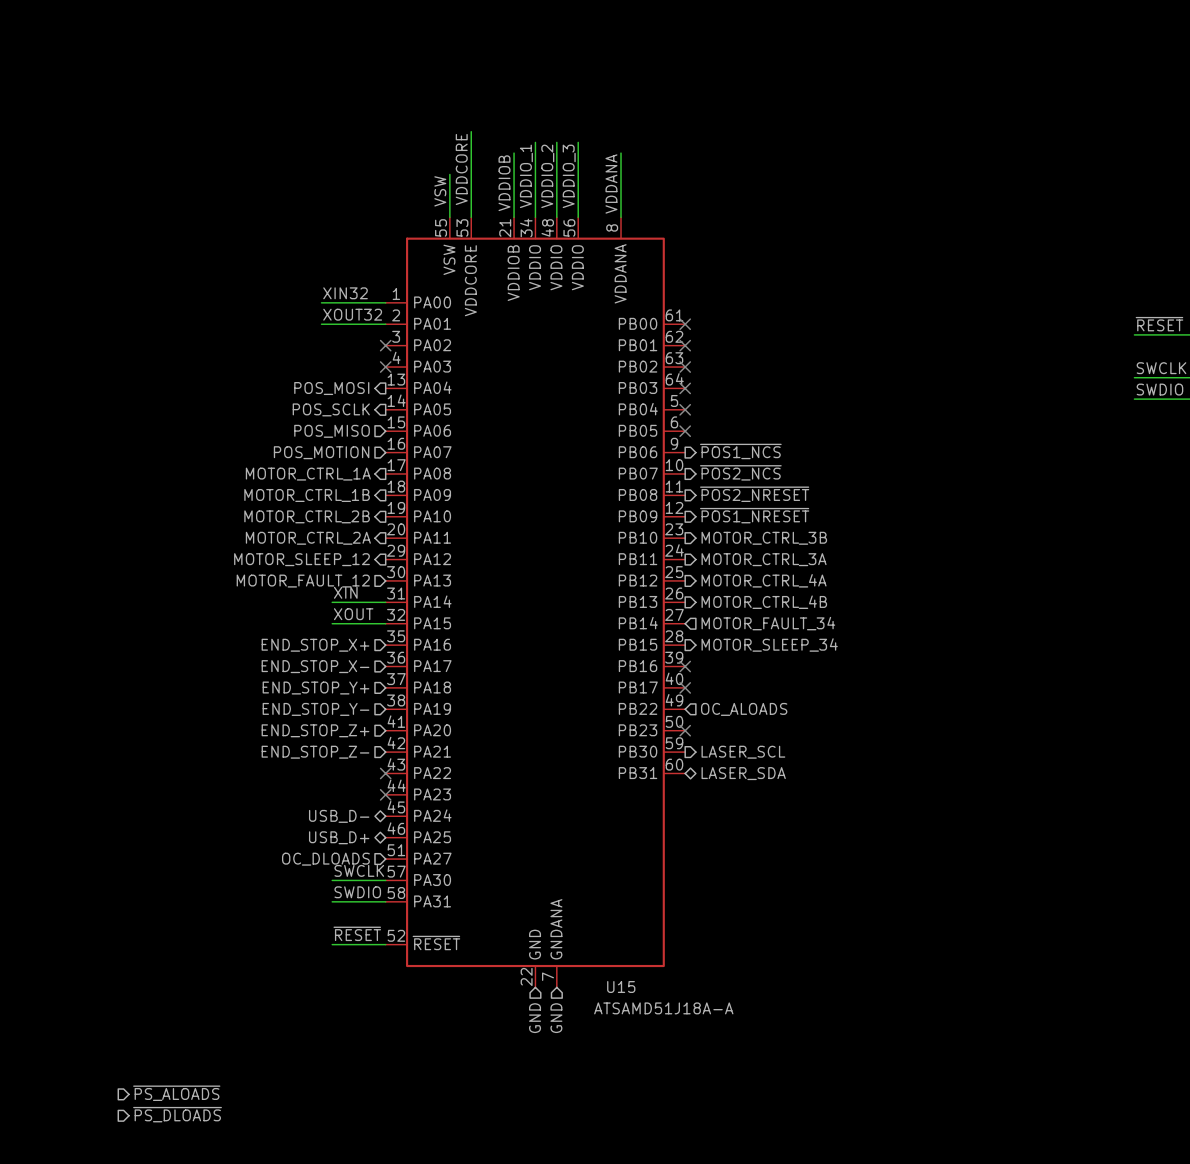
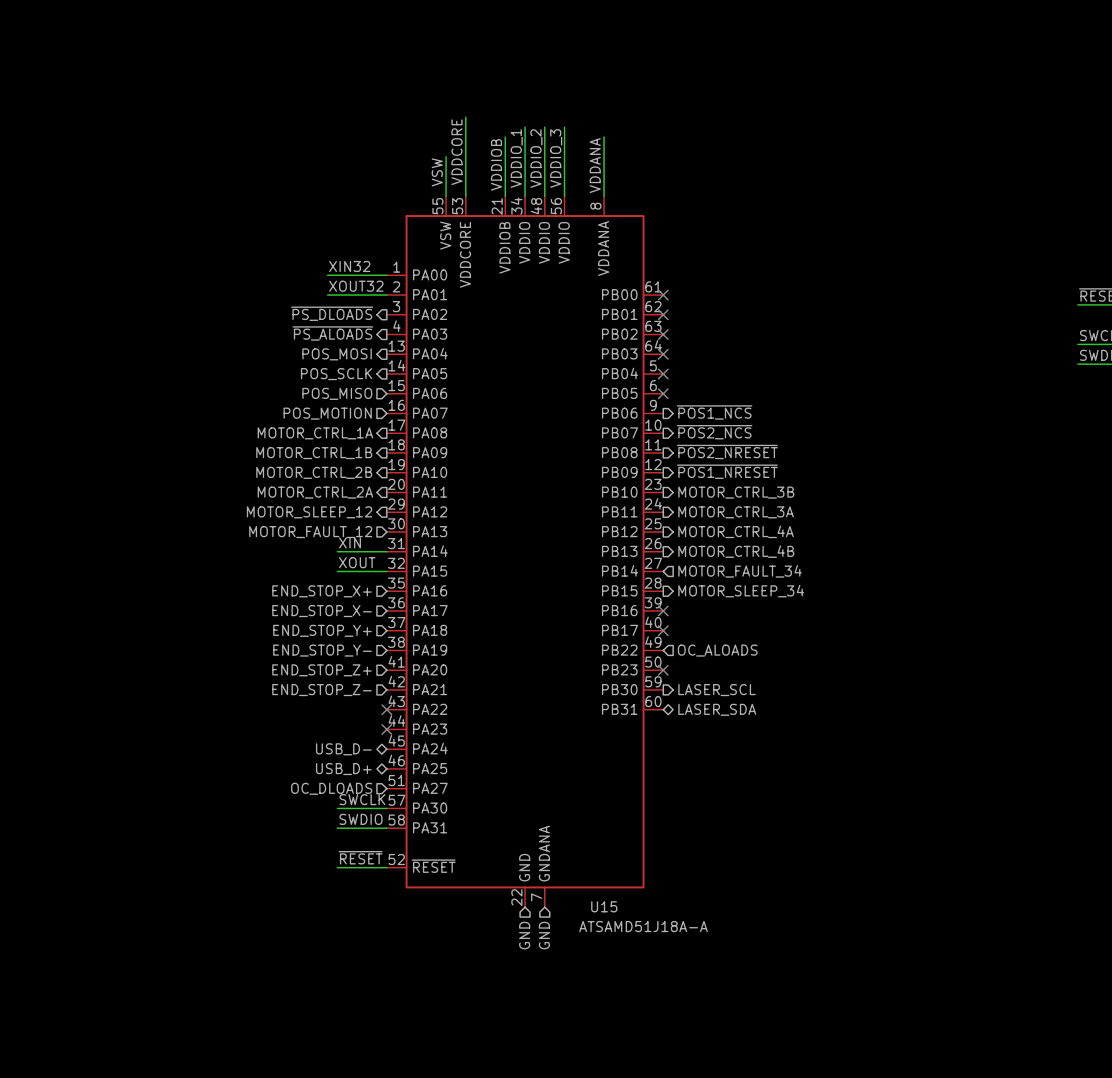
hierarchical label: none -> ~{PS_DLOADS} (332, 313)
no-connect mark: (385, 345) -> none
hierarchical label: none -> ~{PS_ALOADS} (332, 333)
no-connect mark: (385, 367) -> none
hierarchical label: ~{PS_ALOADS} (176, 1093) -> none
hierarchical label: ~{PS_DLOADS} (177, 1114) -> none

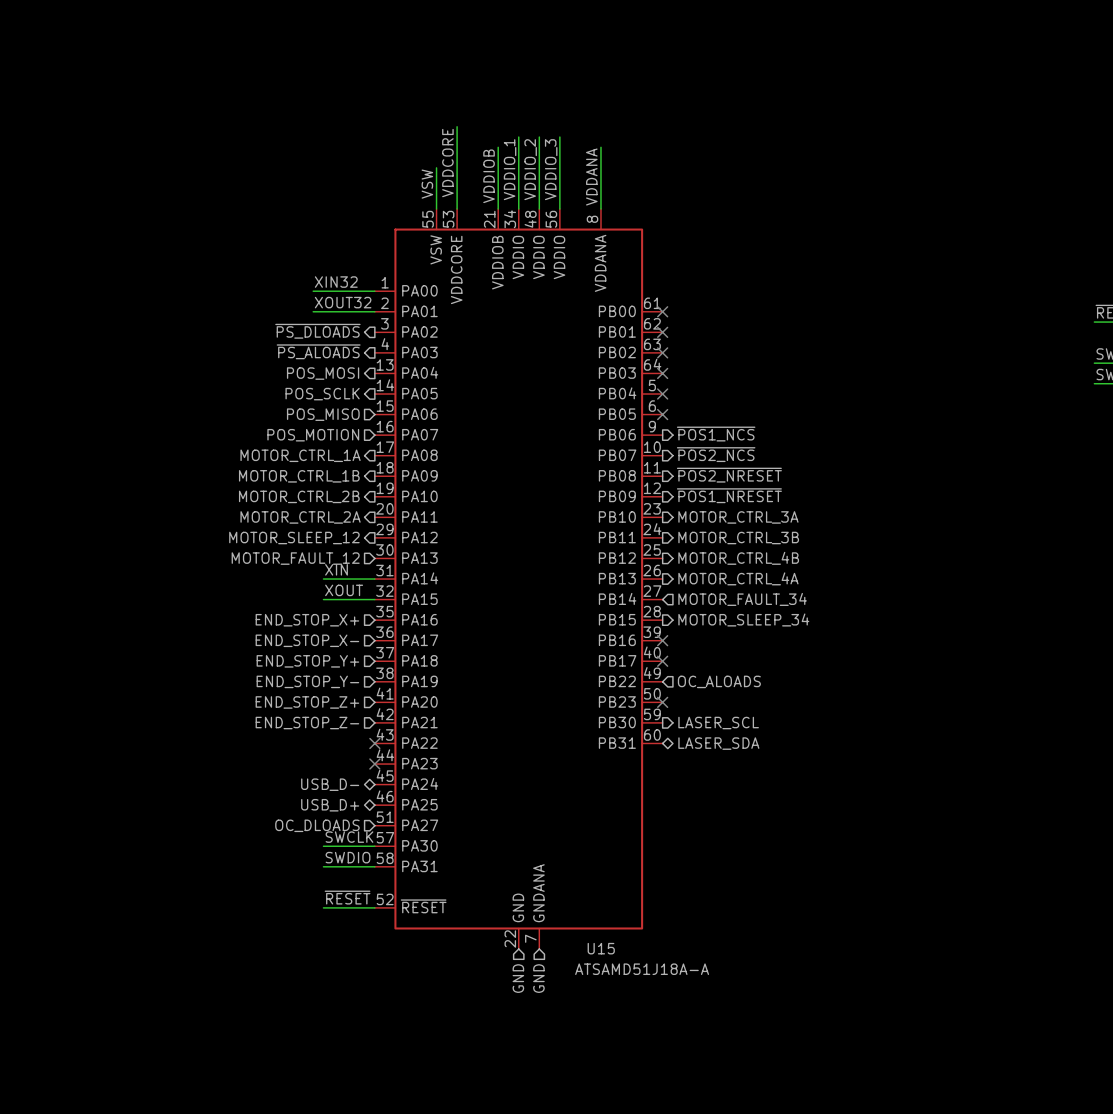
hierarchical label: MOTOR_CTRL_3B (736, 492) -> MOTOR_CTRL_3A (738, 517)
hierarchical label: MOTOR_CTRL_3A (736, 512) -> MOTOR_CTRL_3B (738, 538)
hierarchical label: MOTOR_CTRL_4A (736, 531) -> MOTOR_CTRL_4B (738, 558)
hierarchical label: MOTOR_CTRL_4B (736, 551) -> MOTOR_CTRL_4A (738, 578)

